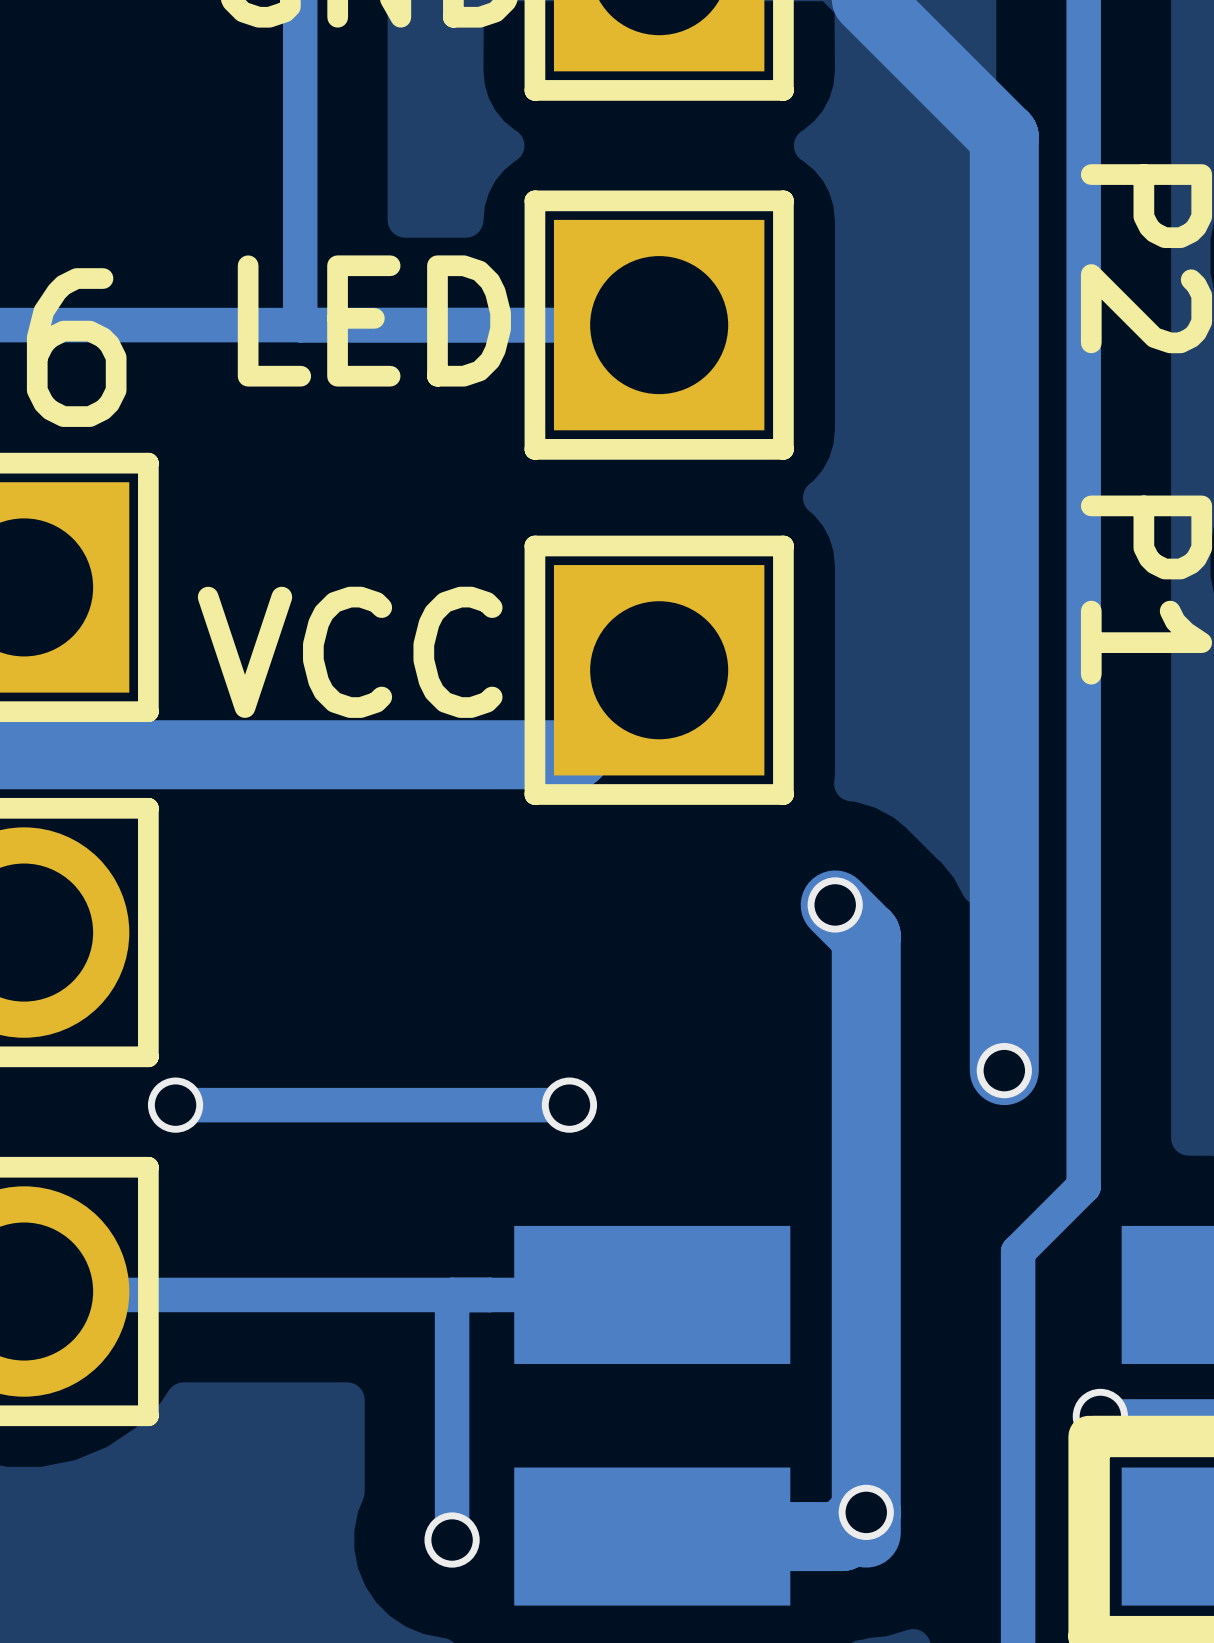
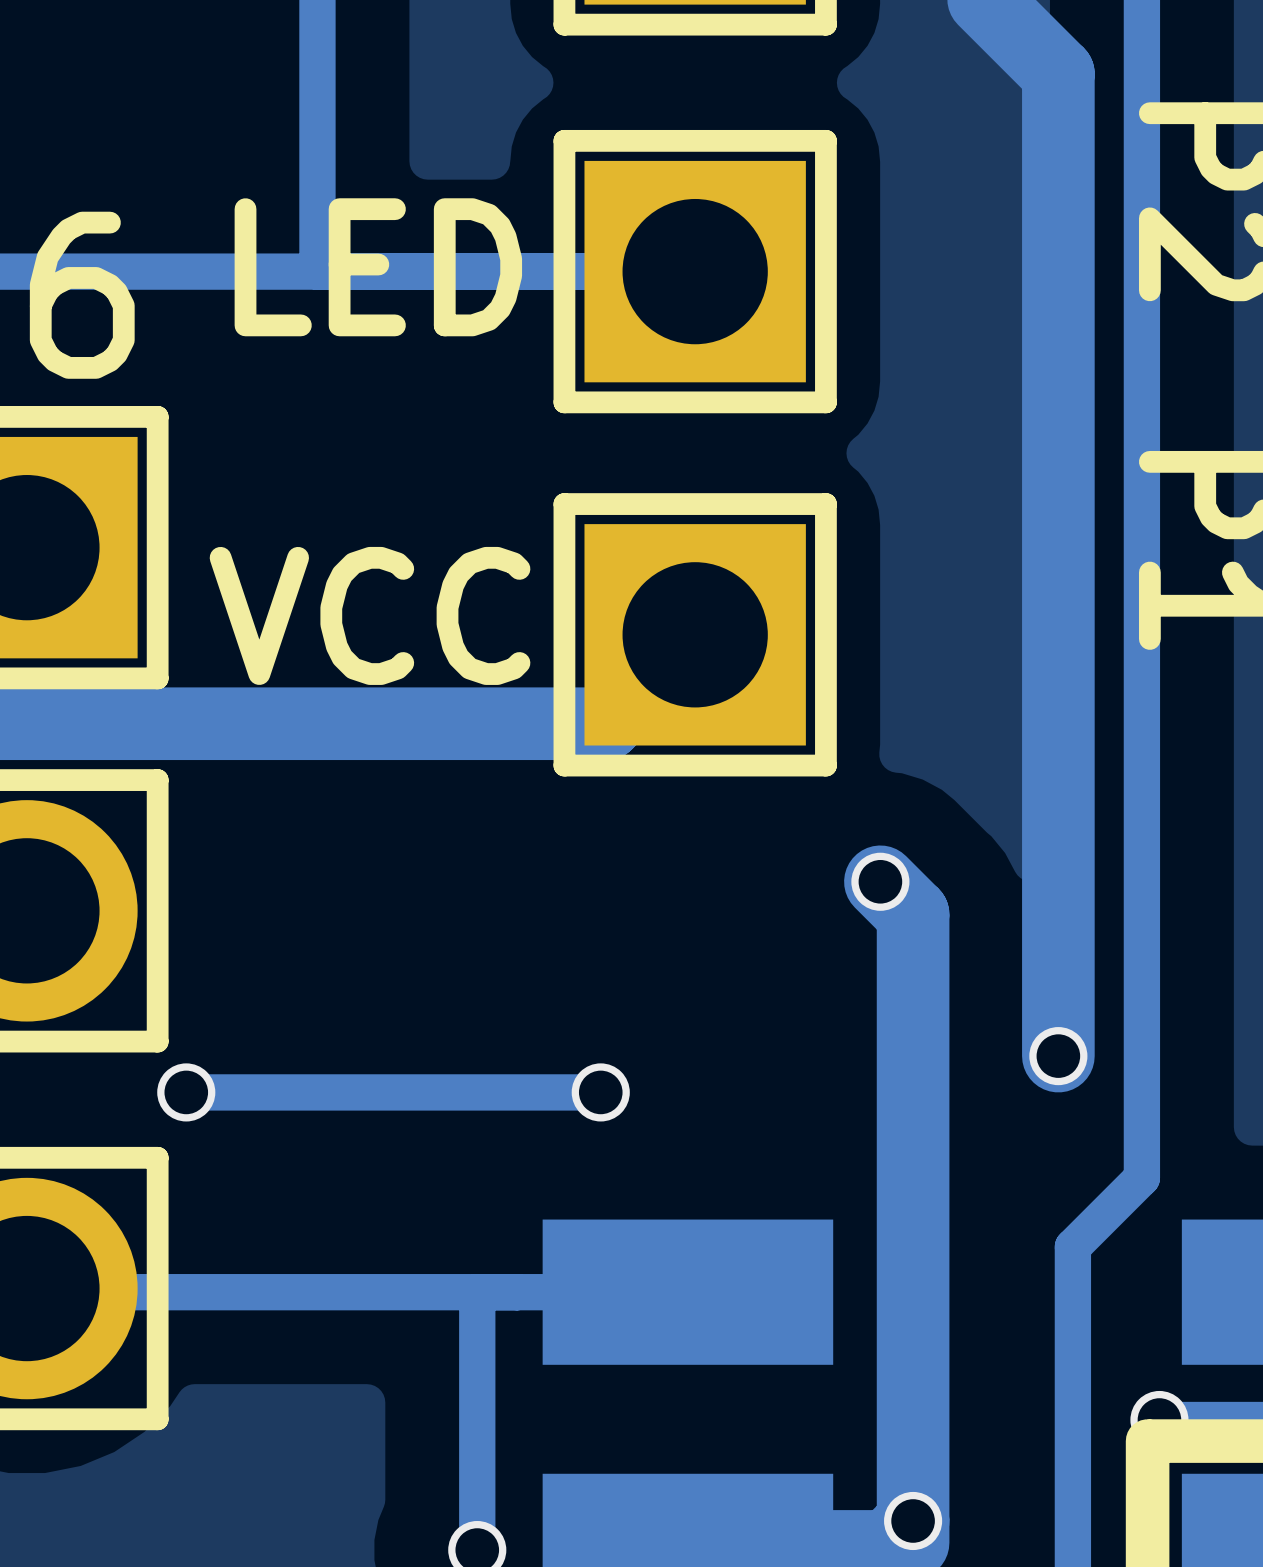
part text position: LED (374, 320) -> LED (378, 267)

